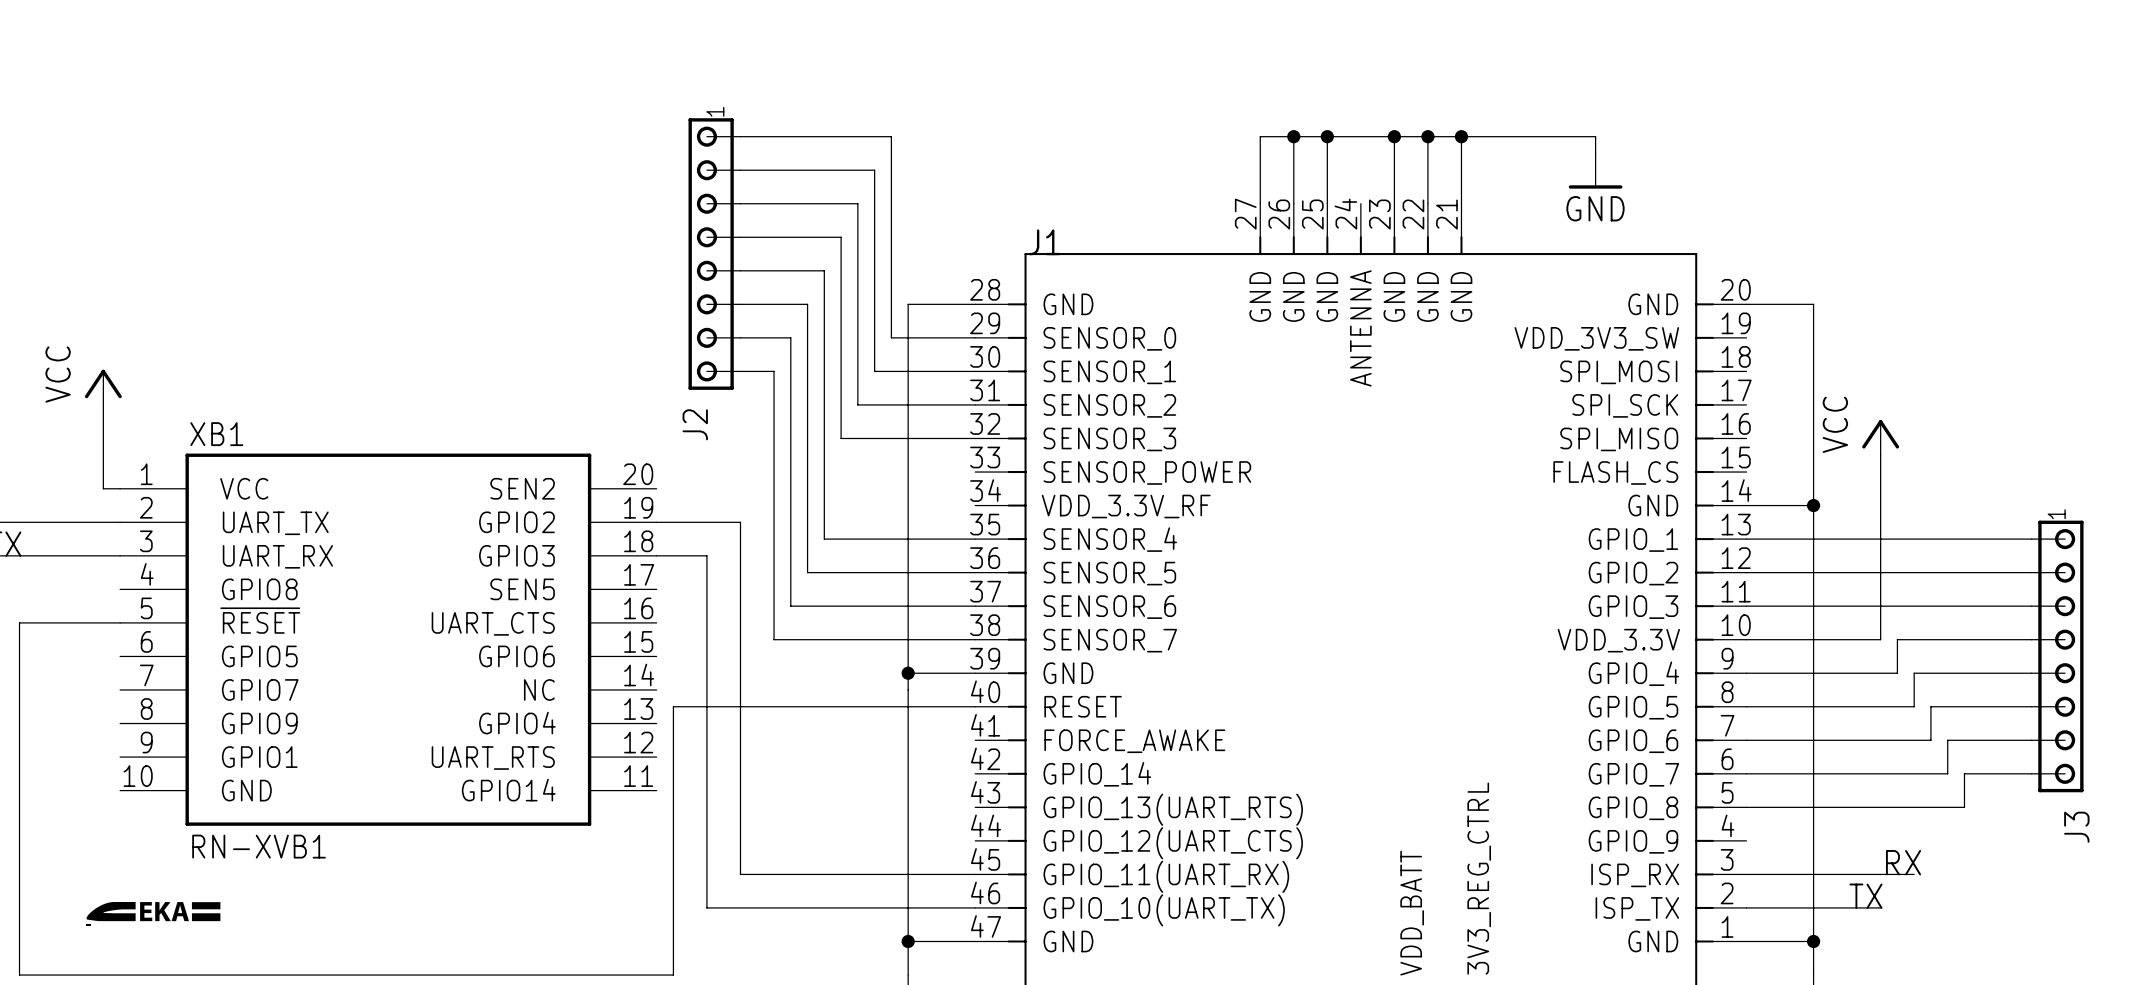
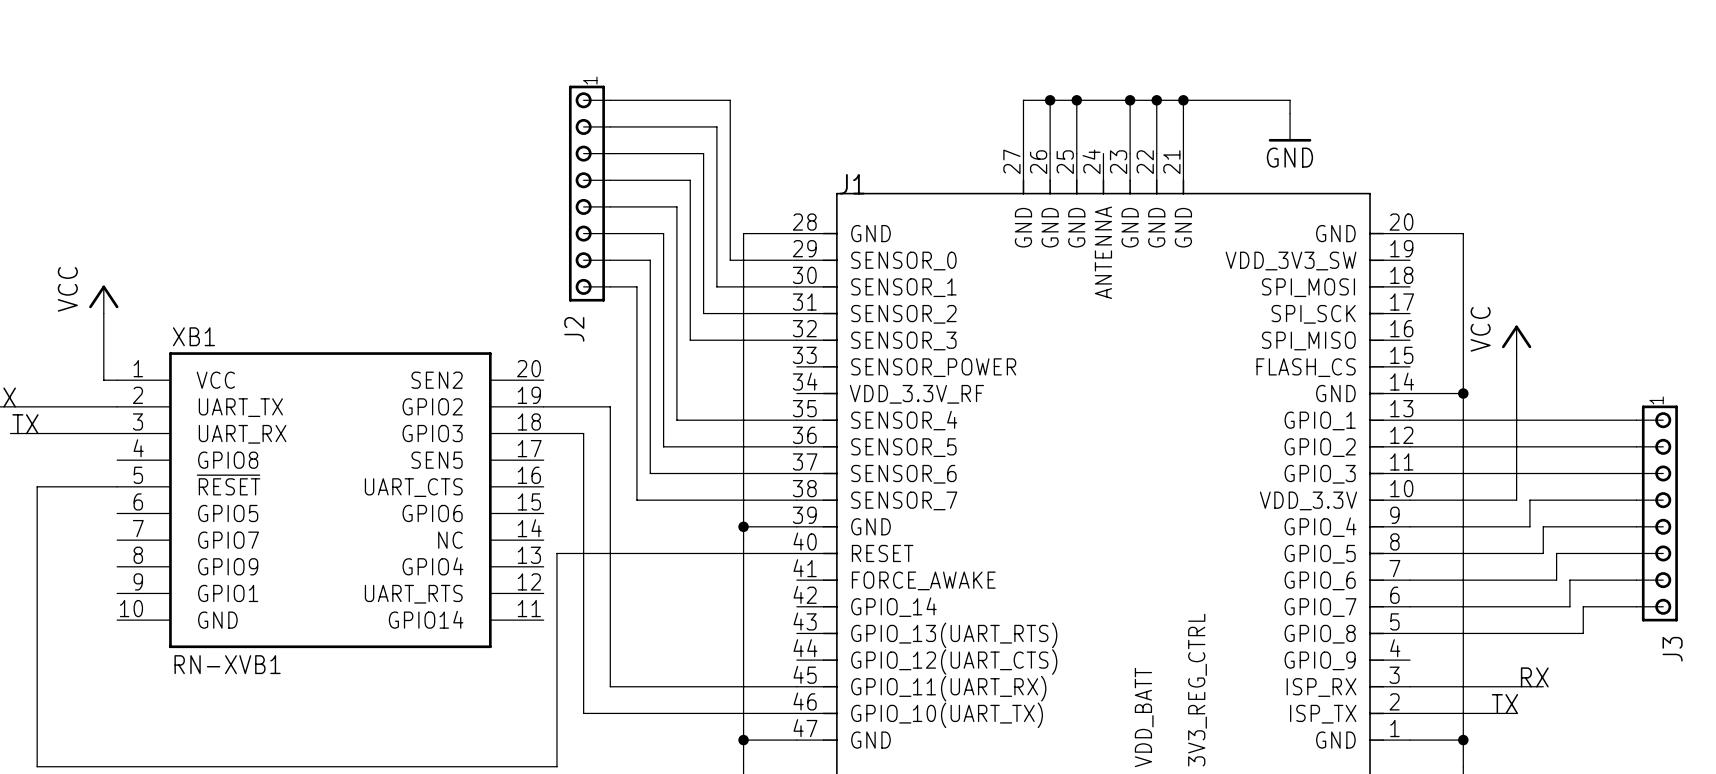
part: (153, 911) -> none

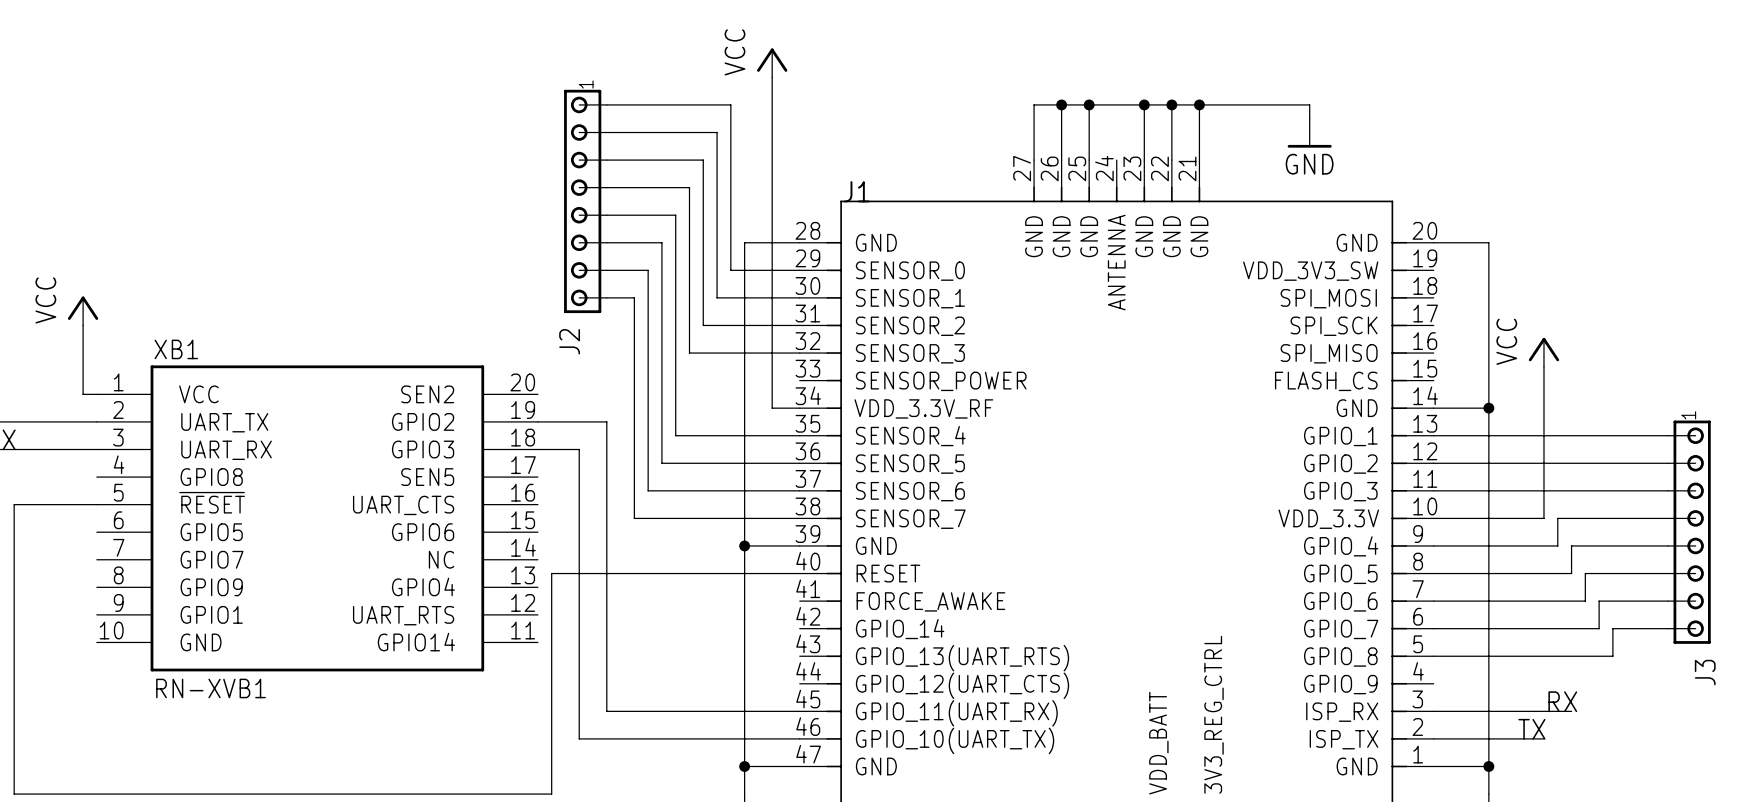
power symbol: none -> VCC (772, 62)
wire: none -> (772, 77) (772, 408) (799, 408)

